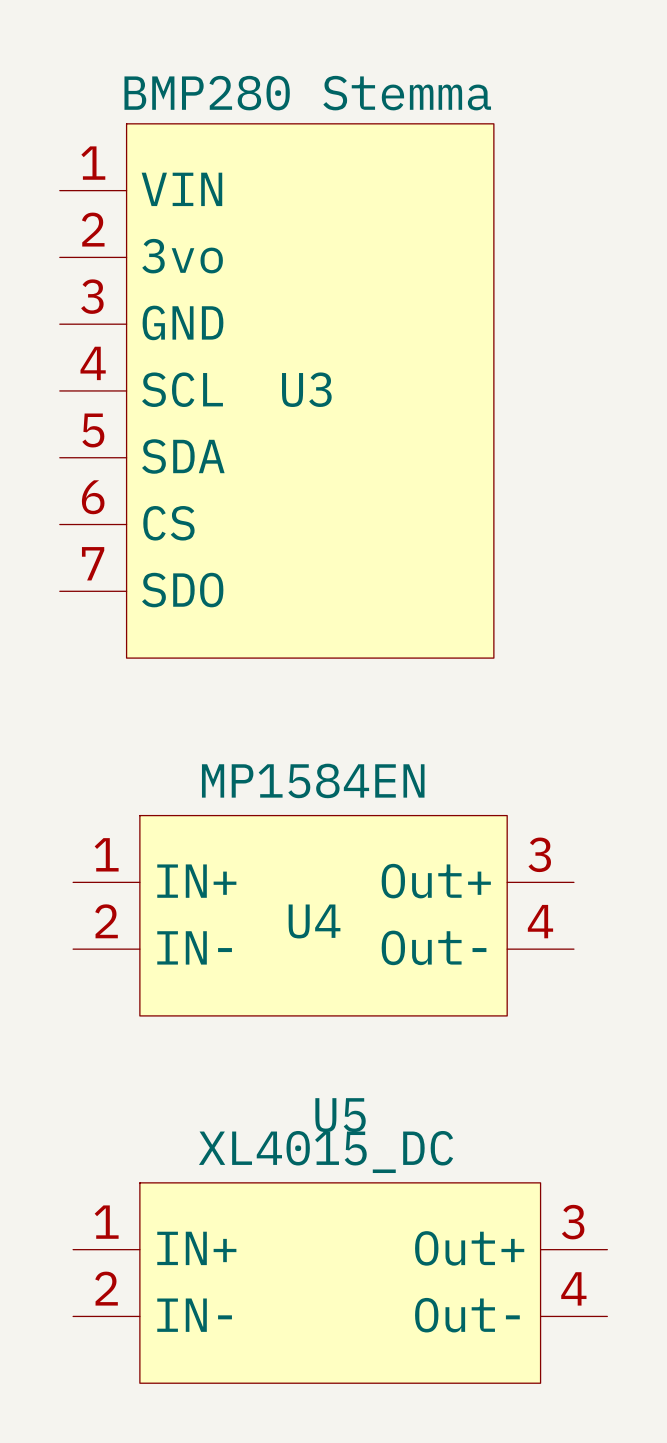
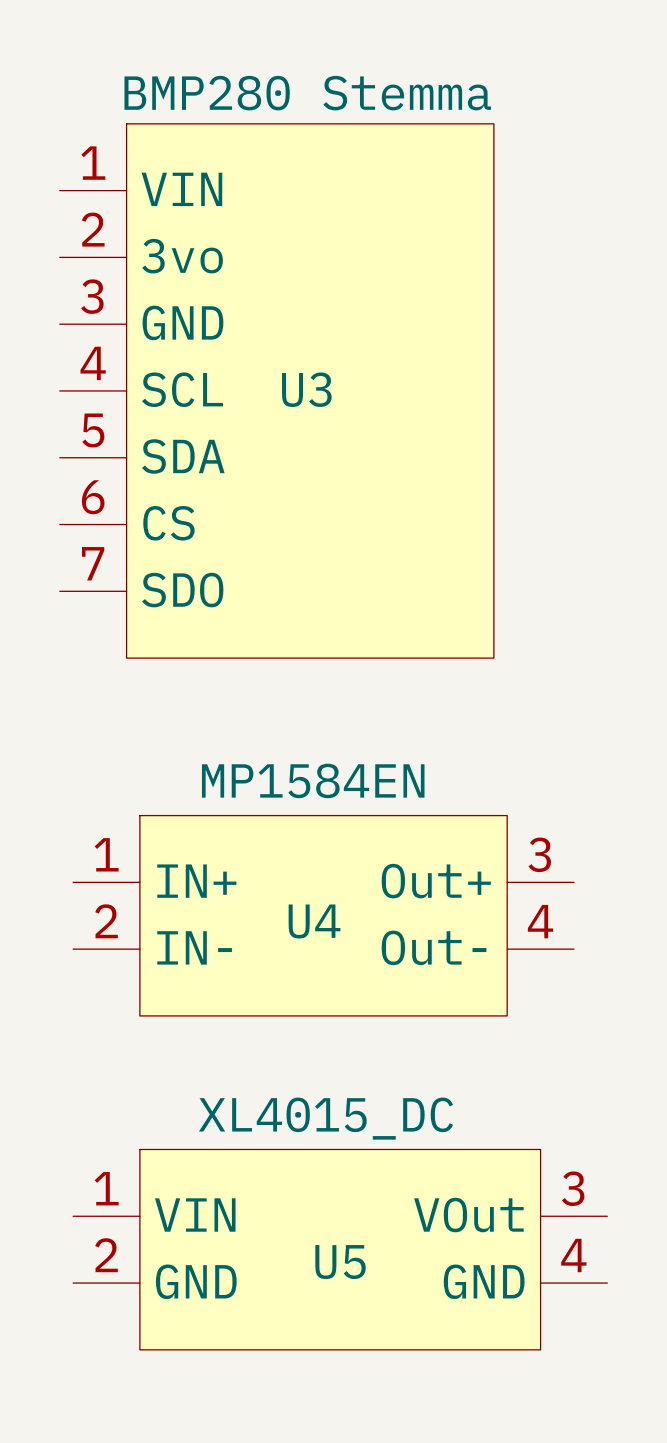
U5 name position: U5 (340, 1115) -> U5 (340, 1262)
U5 pin name: IN+ (196, 1248) -> VIN (195, 1215)
U5 pin name: Out+ (469, 1248) -> VOut (468, 1215)
U5 position: (340, 1283) -> (340, 1249)
U5 pin name: IN- (194, 1315) -> GND (196, 1281)
U5 pin name: Out- (467, 1315) -> GND (484, 1281)

